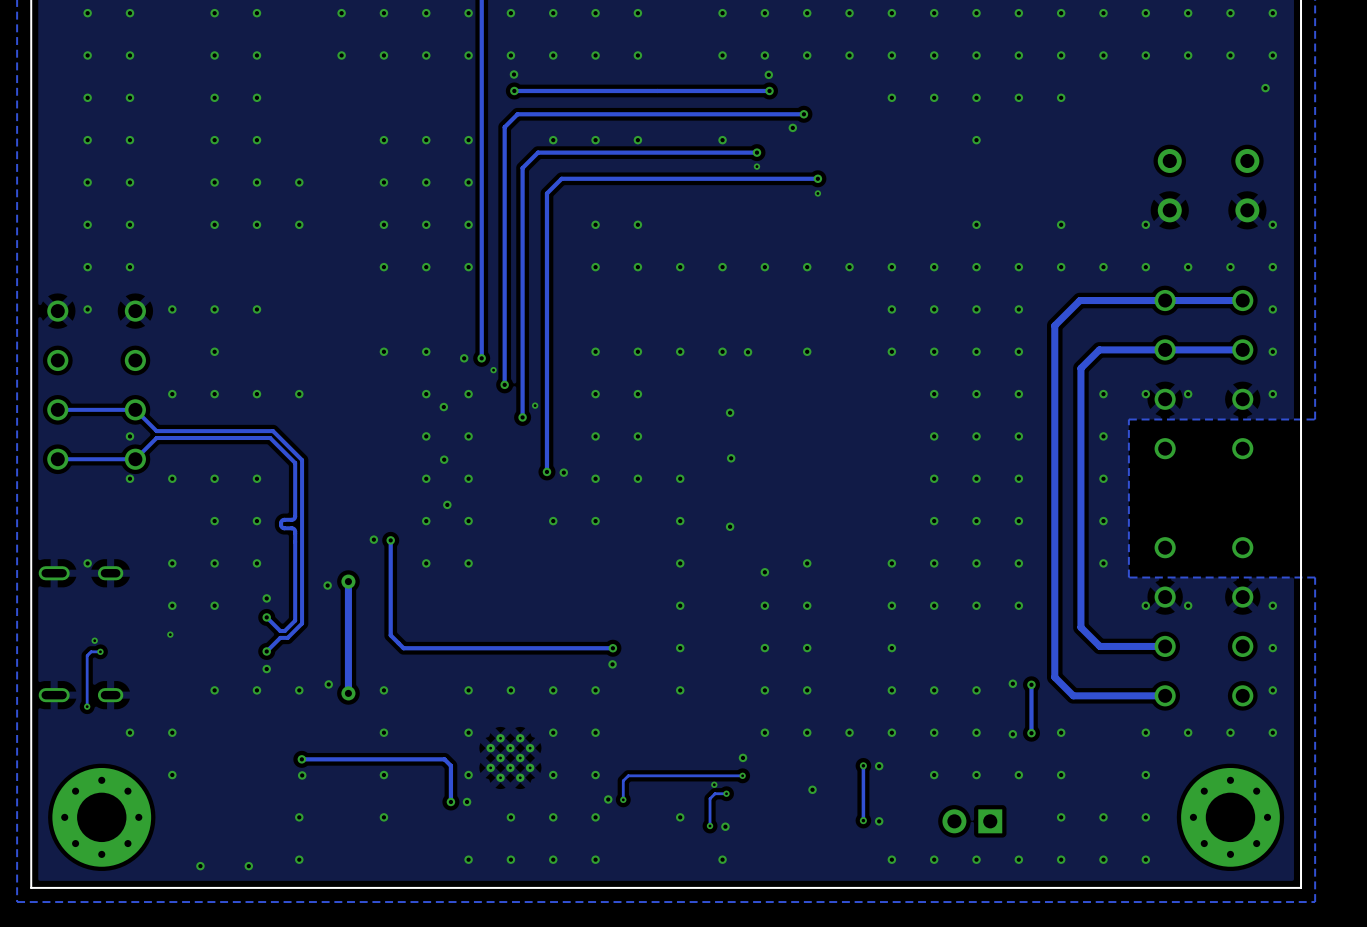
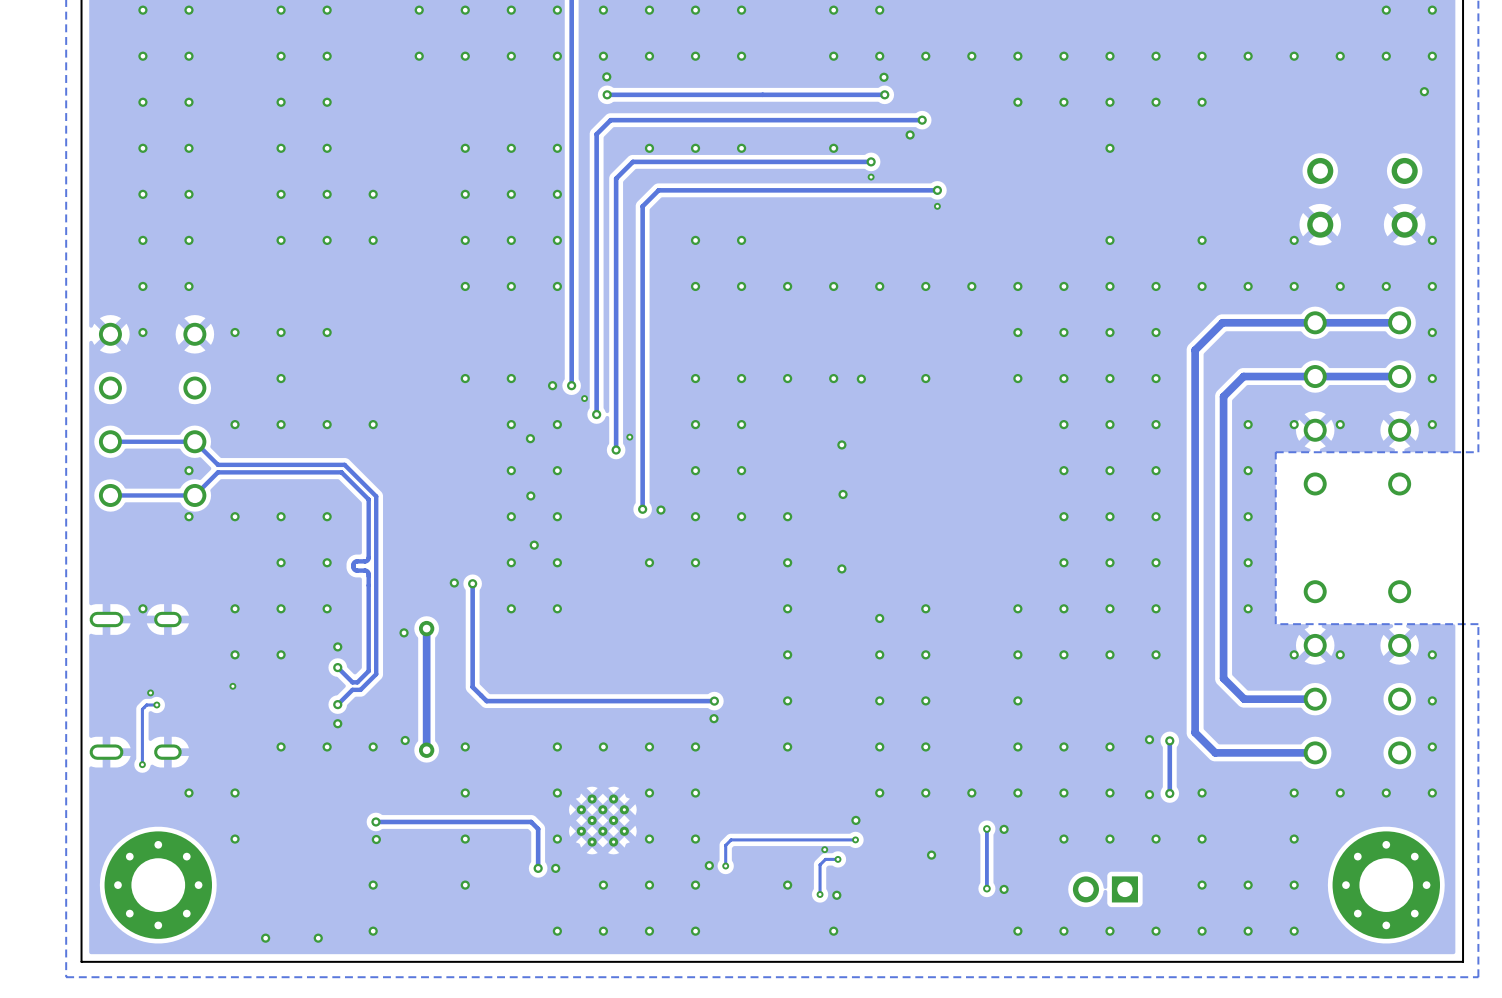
via: (807, 13) -> none
via: (849, 13) -> none
via: (891, 13) -> none
via: (934, 13) -> none
via: (976, 13) -> none
via: (1018, 13) -> none
via: (1061, 13) -> none
via: (1103, 13) -> none
via: (1145, 13) -> none
via: (1188, 13) -> none

